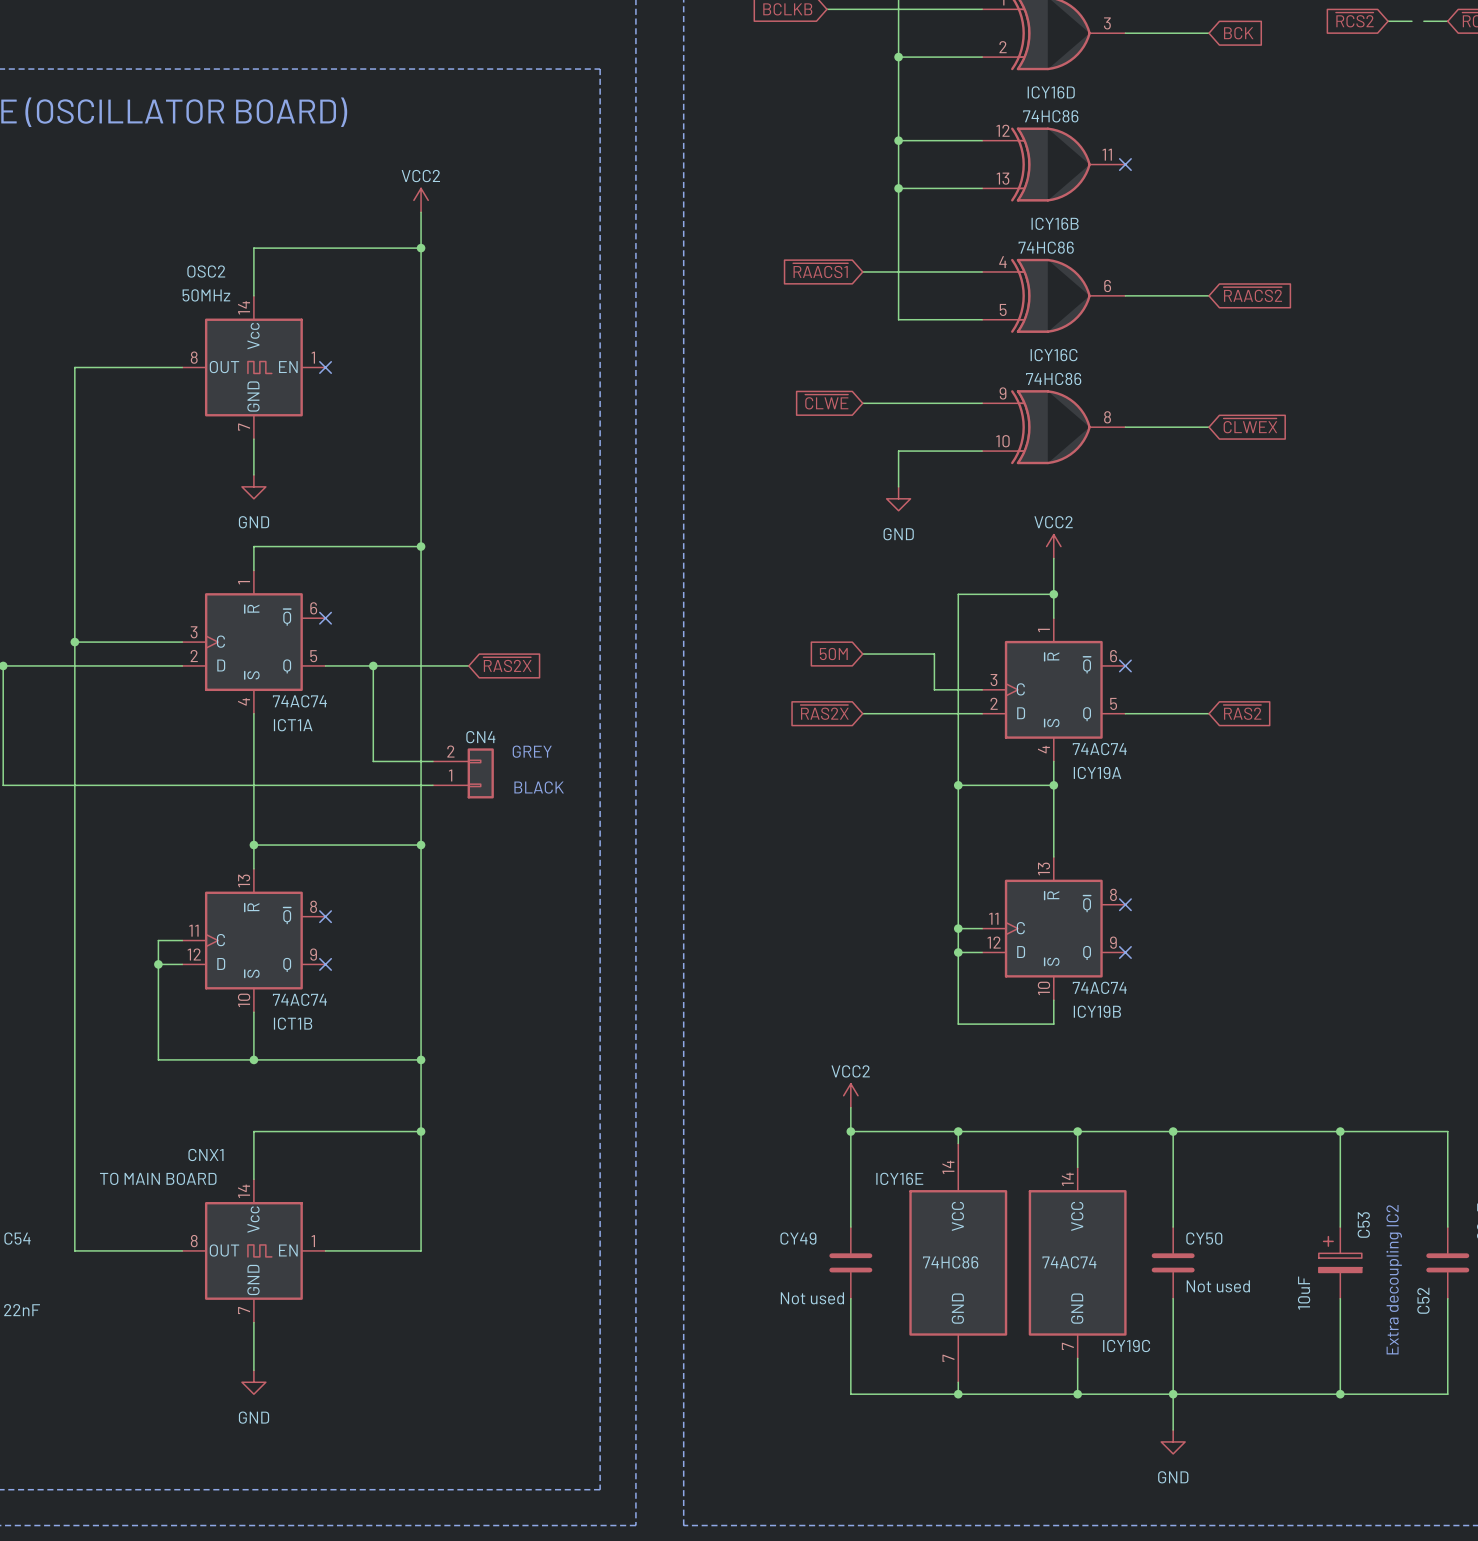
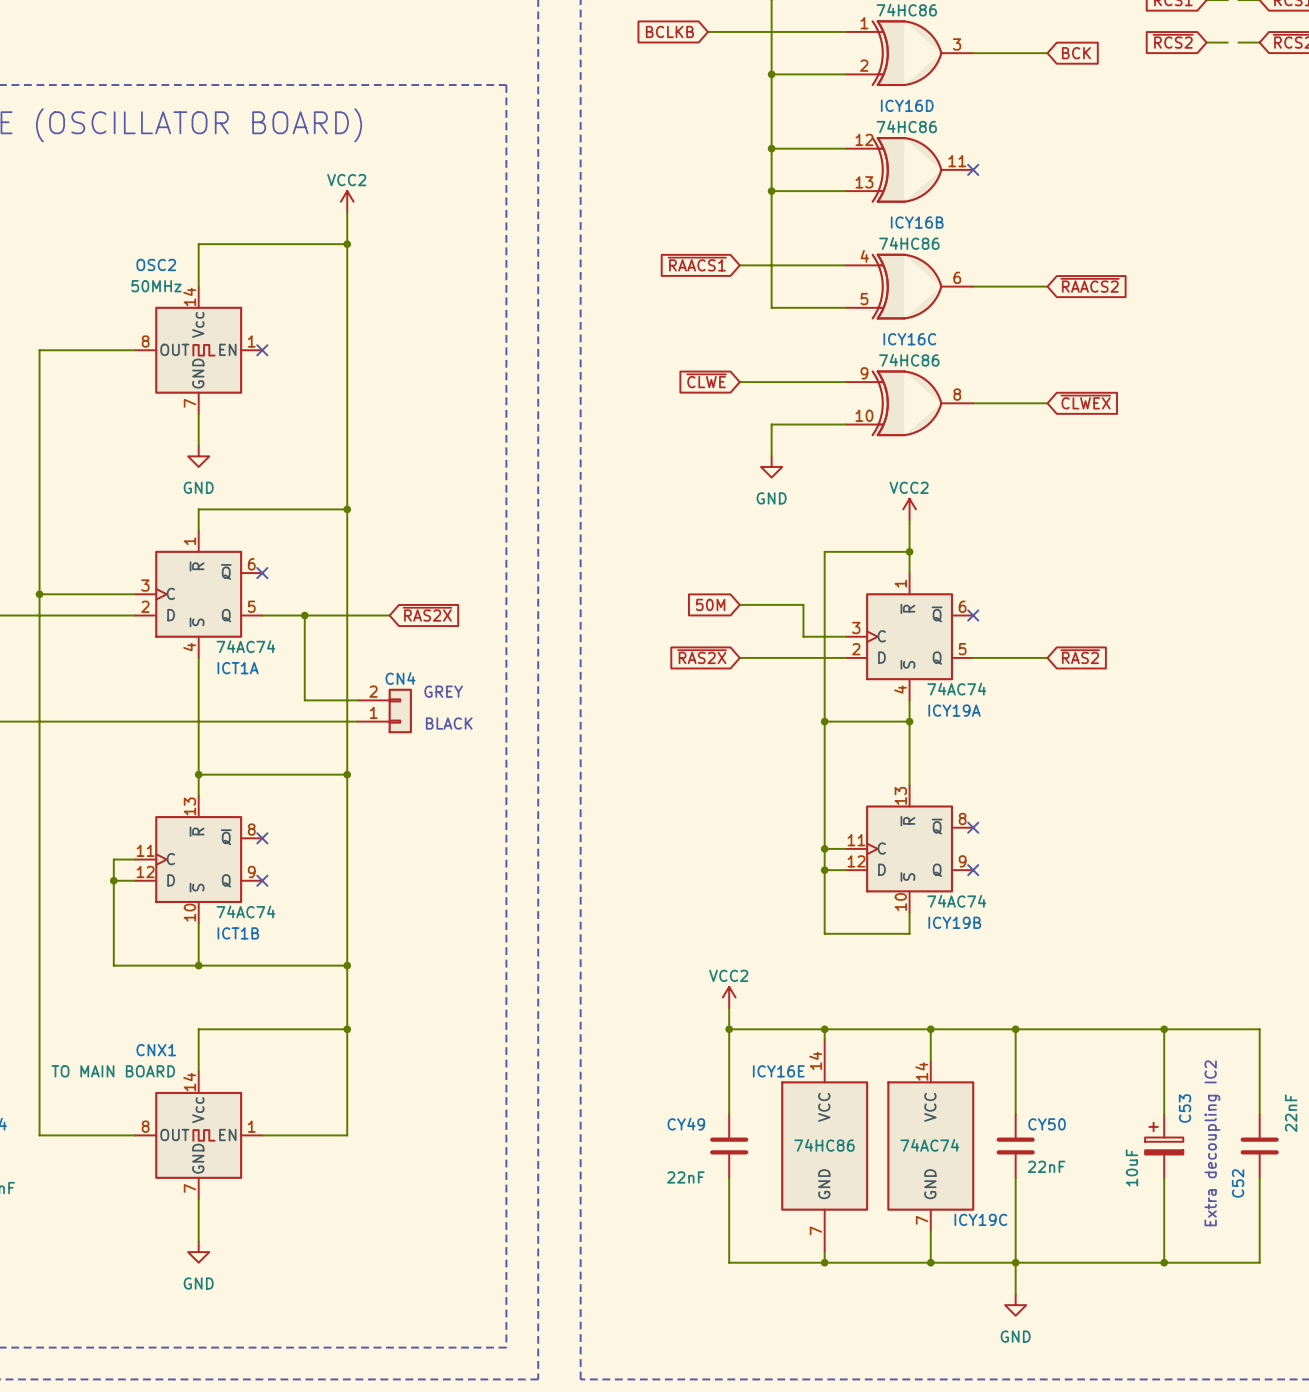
CY50 value: Not used (1218, 1286) -> 22nF (1046, 1166)
CY49 value: Not used (812, 1298) -> 22nF (685, 1177)

